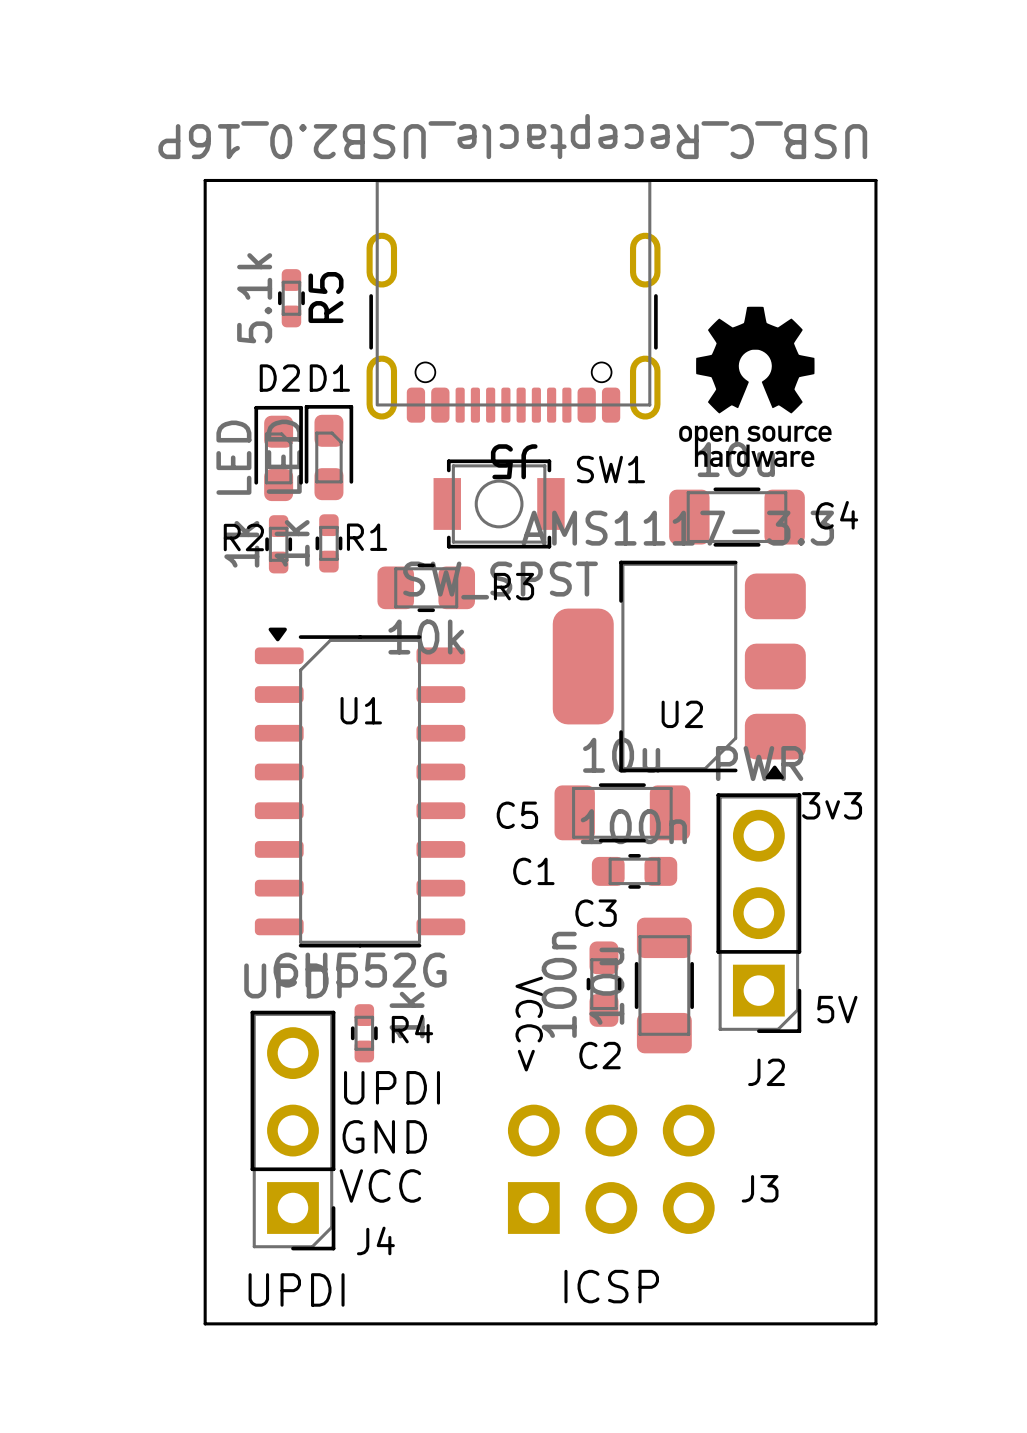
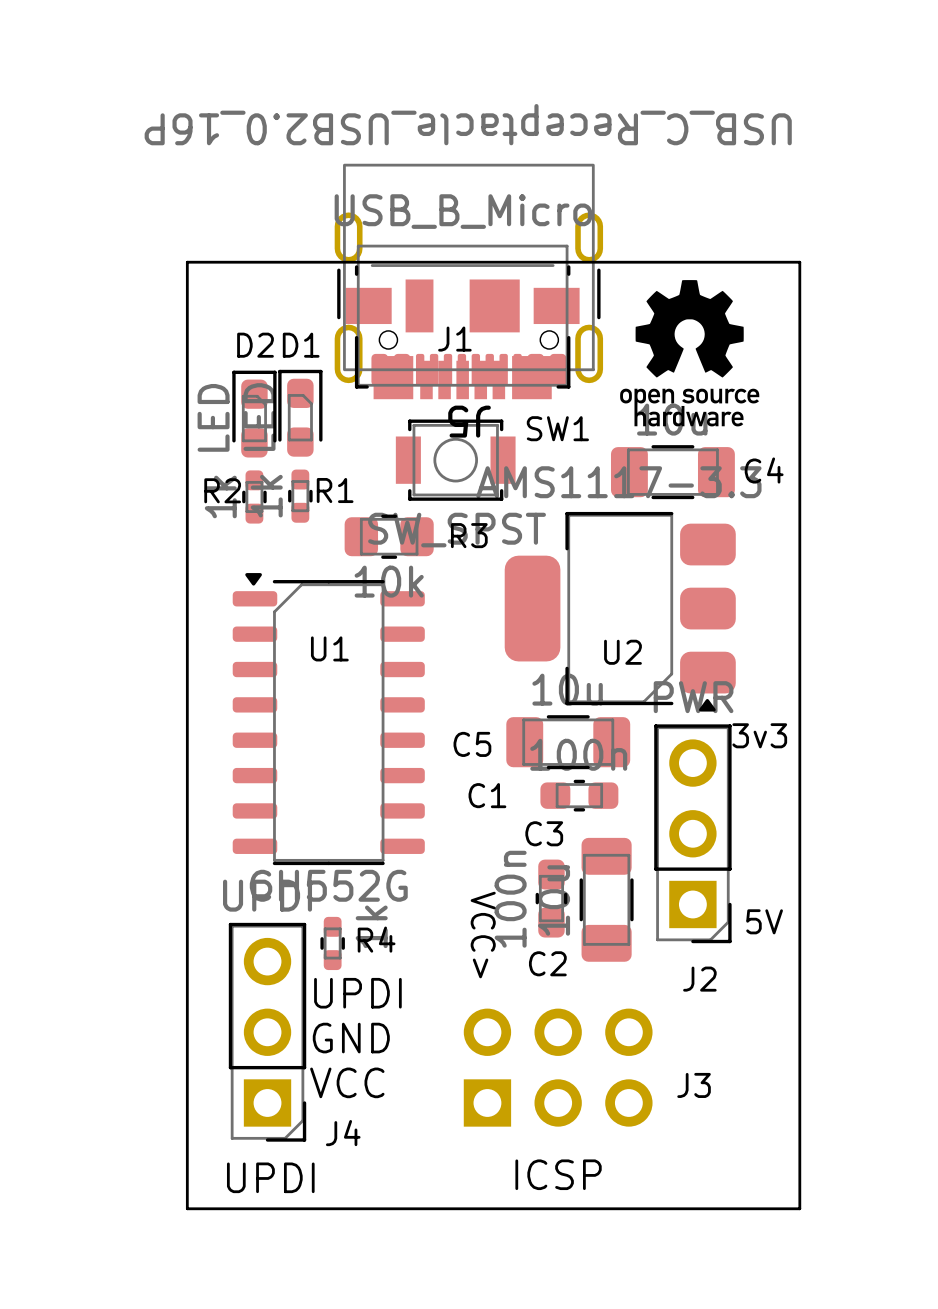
board edge: (205, 287) (205, 180) (875, 180) (875, 287) -> (187, 262) (799, 262)
R5: 5.1k (291, 298) -> none
J1: none -> USB_B_Micro (462, 321)

